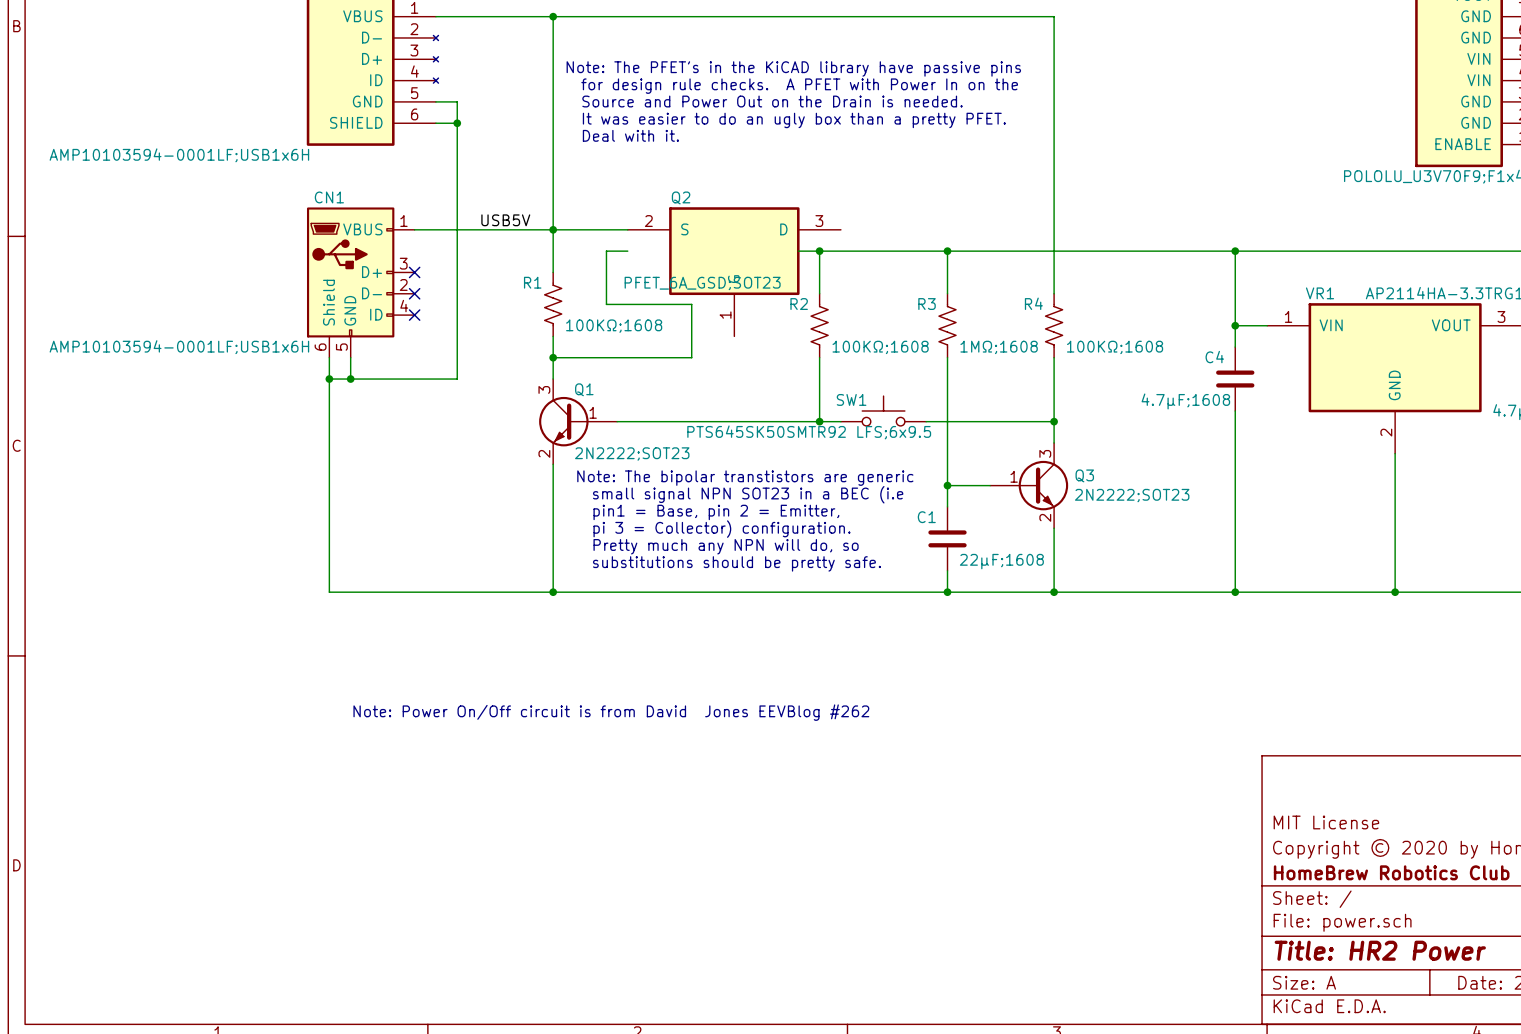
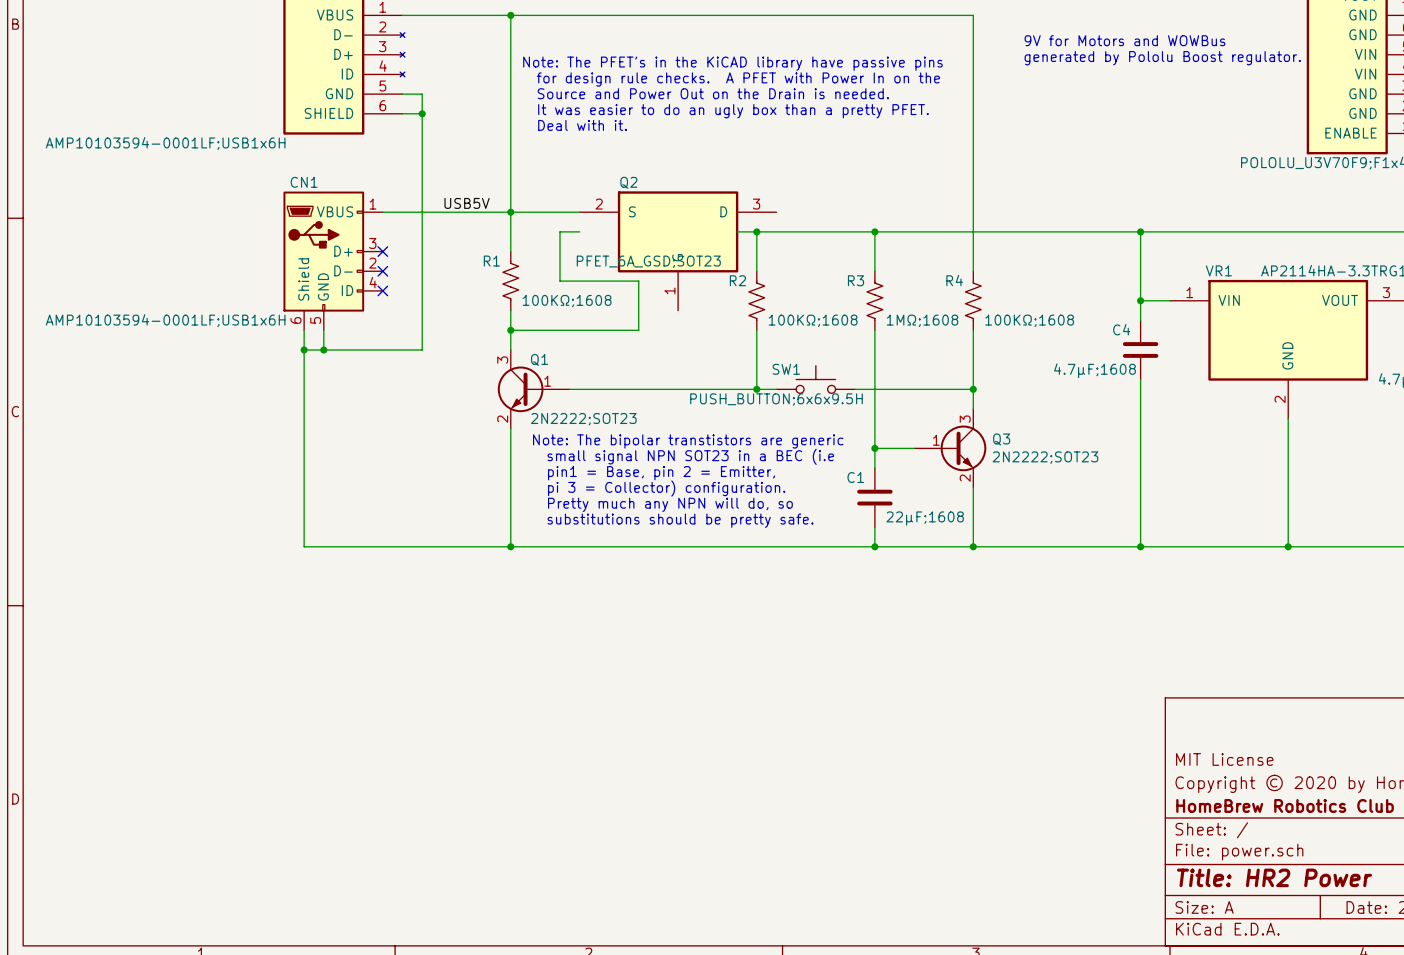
text: none -> 9V for Motors and WOWBus (1124, 40)
text: none -> generated by Pololu Boost regulator. (1162, 58)
SW1 value: PTS645SK50SMTR92 LFS;6x9.5 (809, 432) -> PUSH_BUTTON;6x6x9.5H (776, 399)
text: Note: Power On/Off circuit is from David Jones EEVBlog #262 (611, 712) -> none

